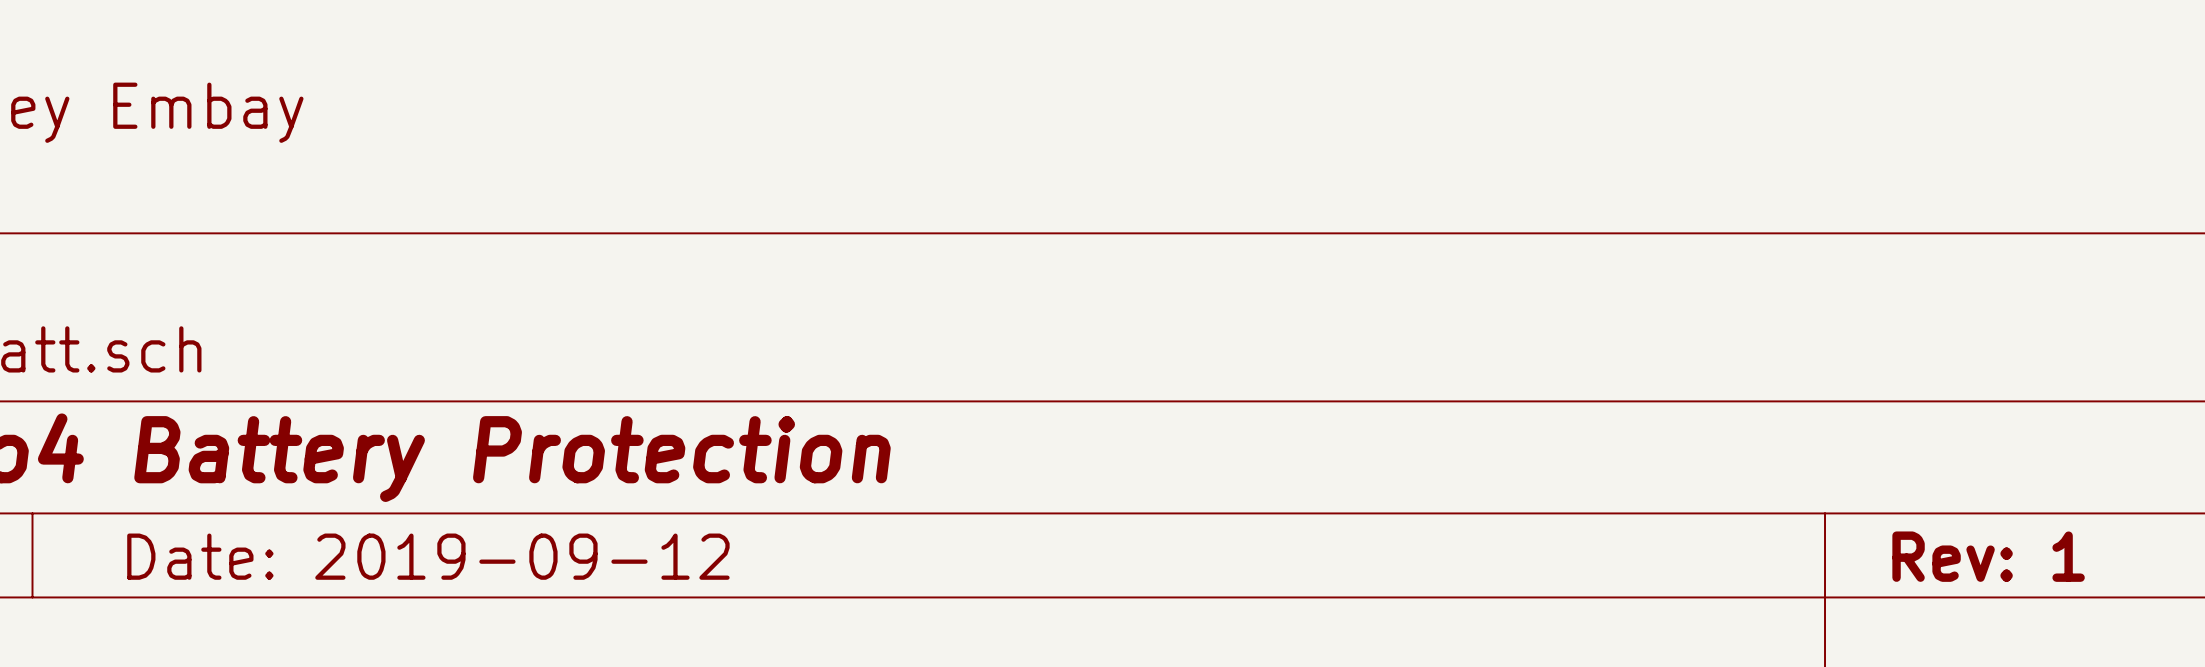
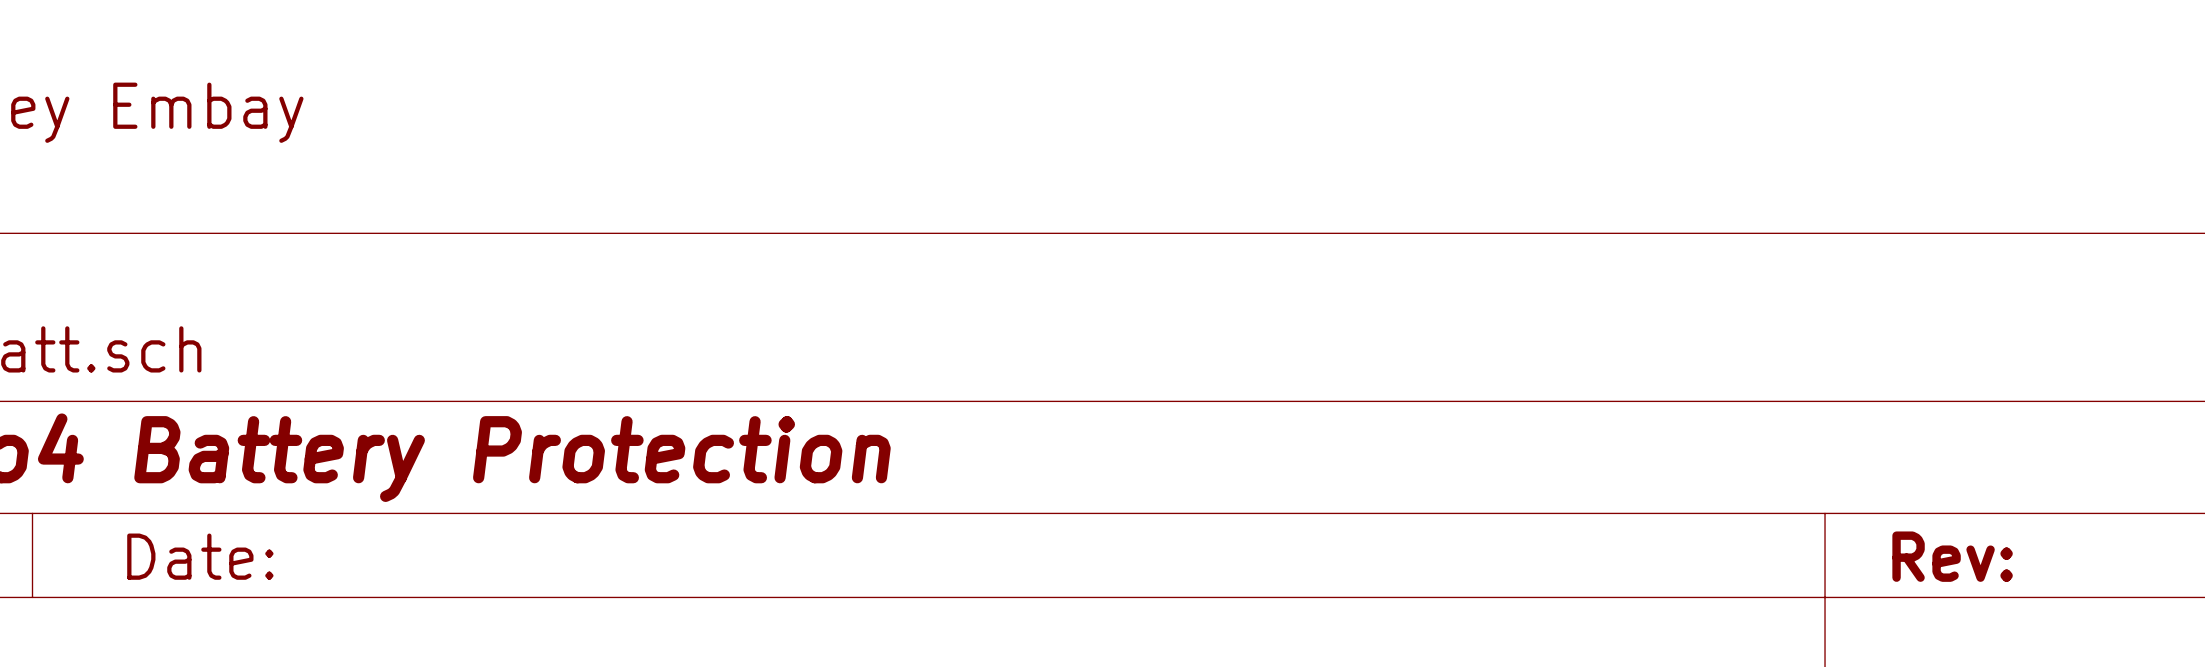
title block: Date: 2019-09-12 (428, 556) -> Date: (200, 556)
title block: Rev: 1 (1988, 556) -> Rev: (1952, 556)

